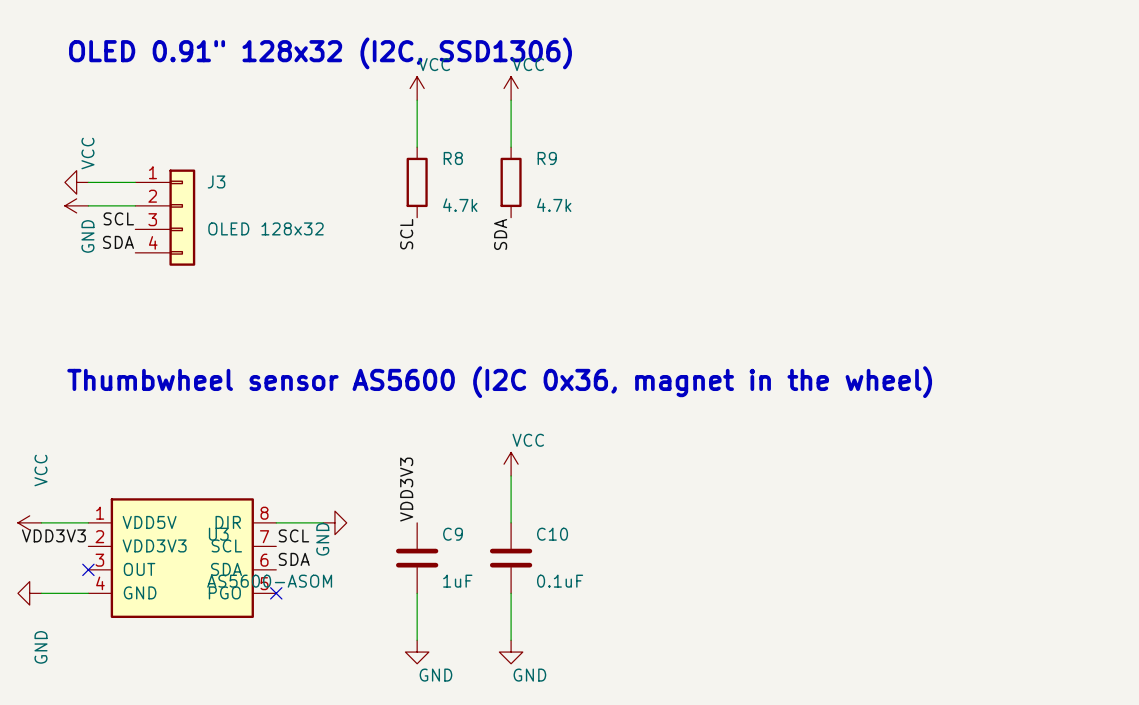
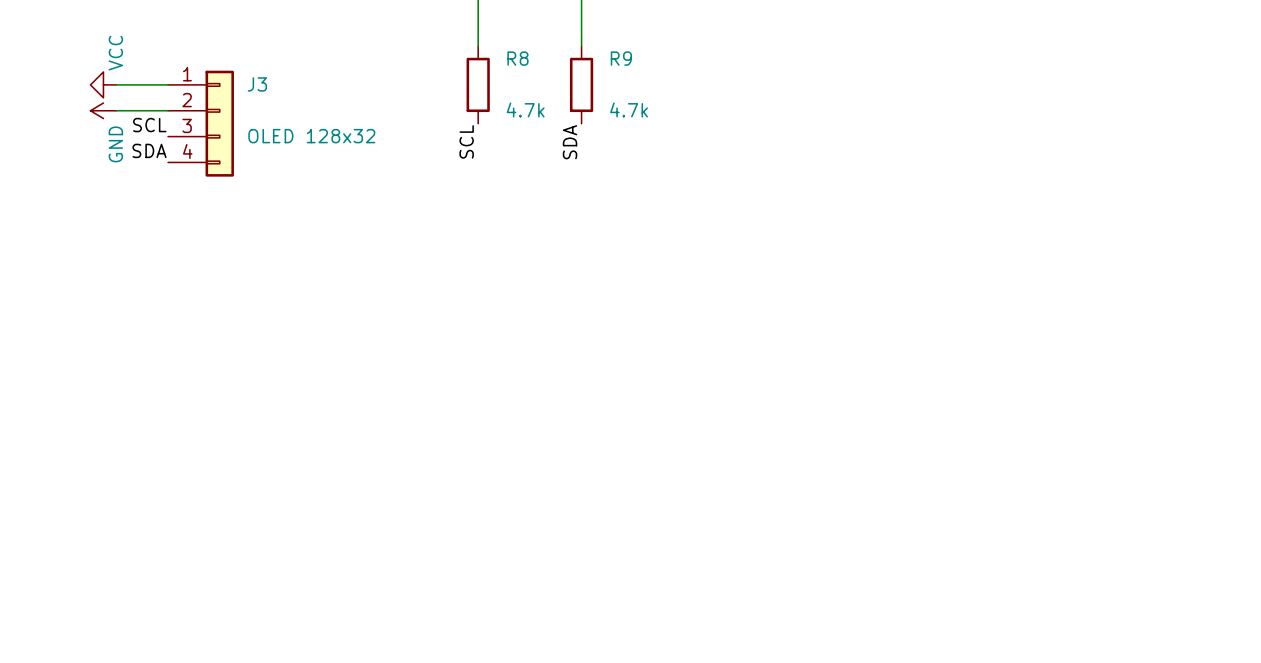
text: Thumbwheel sensor AS5600 (I2C 0x36, magnet in the wheel) (499, 382) -> none
power symbol: VCC (511, 464) -> none
wire: (511, 475) (511, 522) -> none
label: VDD3V3 (406, 489) -> none
power symbol: VCC (29, 522) -> none
wire: (41, 522) (88, 522) -> none
wire: (276, 522) (323, 522) -> none
power symbol: GND (334, 522) -> none
label: VDD3V3 (53, 535) -> none
label: SCL (293, 535) -> none
U3: AS5600-ASOM (182, 558) -> none
C9: 1uF (417, 558) -> none
C10: 0.1uF (511, 558) -> none
label: SDA (294, 559) -> none
no-connect mark: (88, 569) -> none
power symbol: GND (29, 593) -> none
wire: (41, 593) (88, 593) -> none
no-connect mark: (276, 593) -> none
wire: (417, 593) (417, 640) -> none
wire: (511, 593) (511, 640) -> none
power symbol: GND (417, 652) -> none
power symbol: GND (511, 652) -> none

